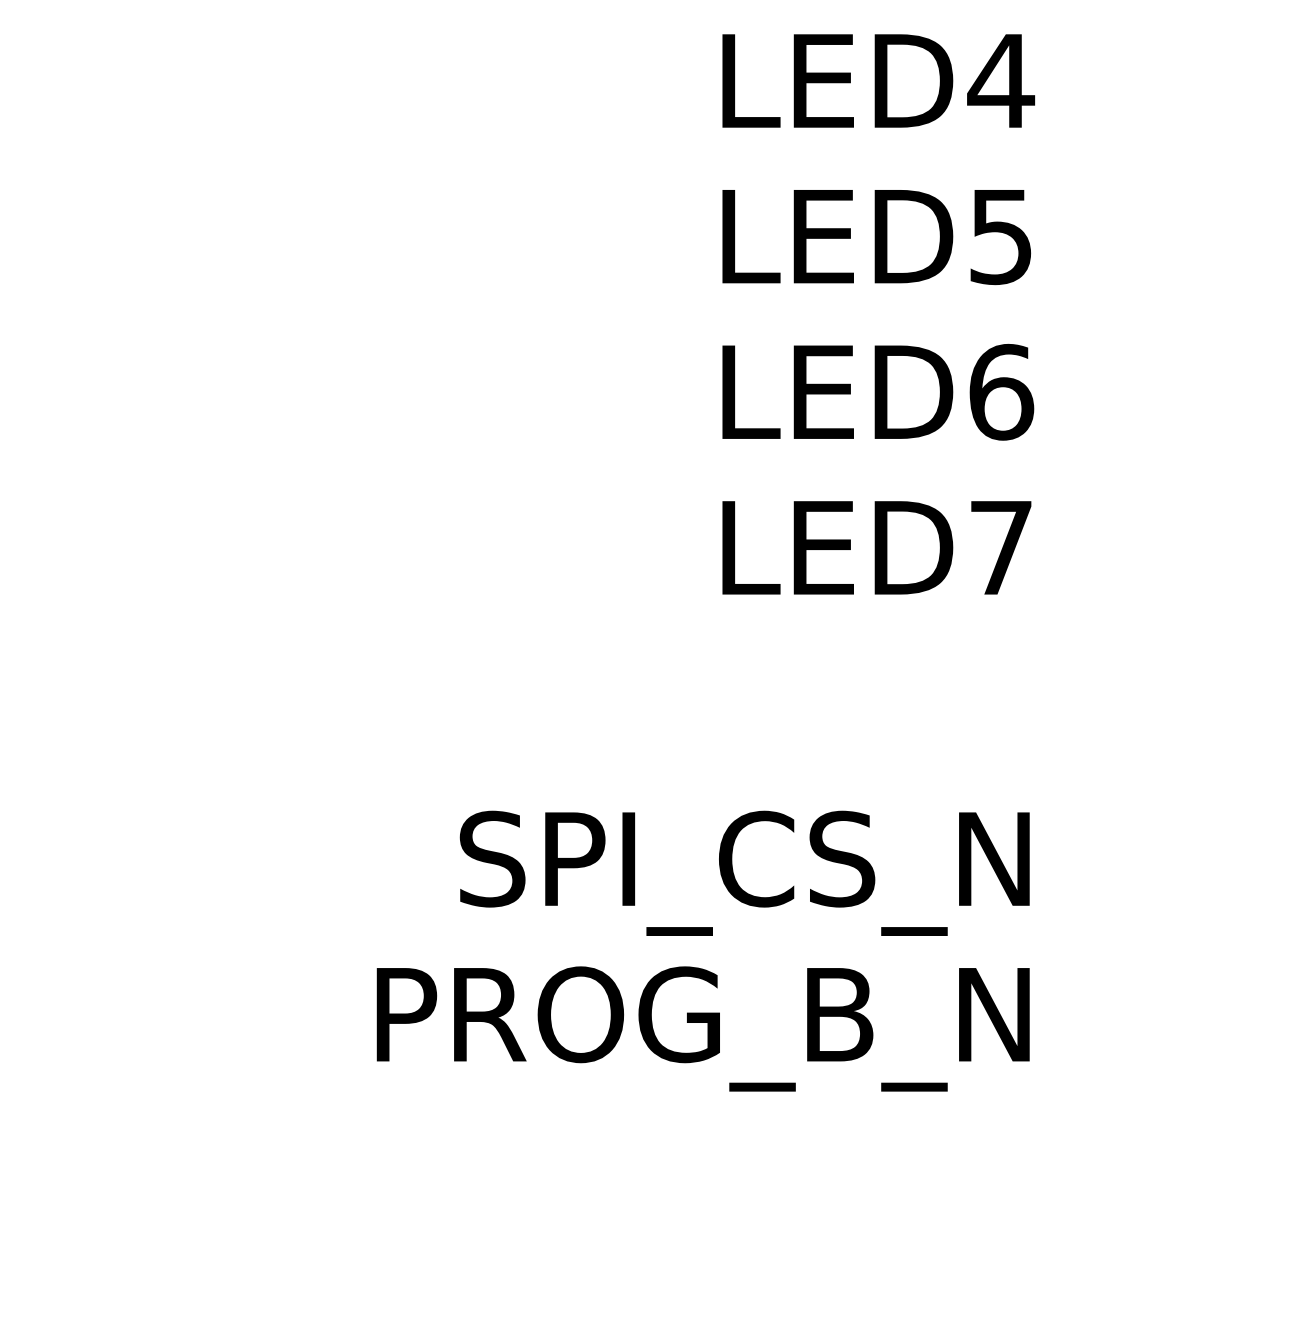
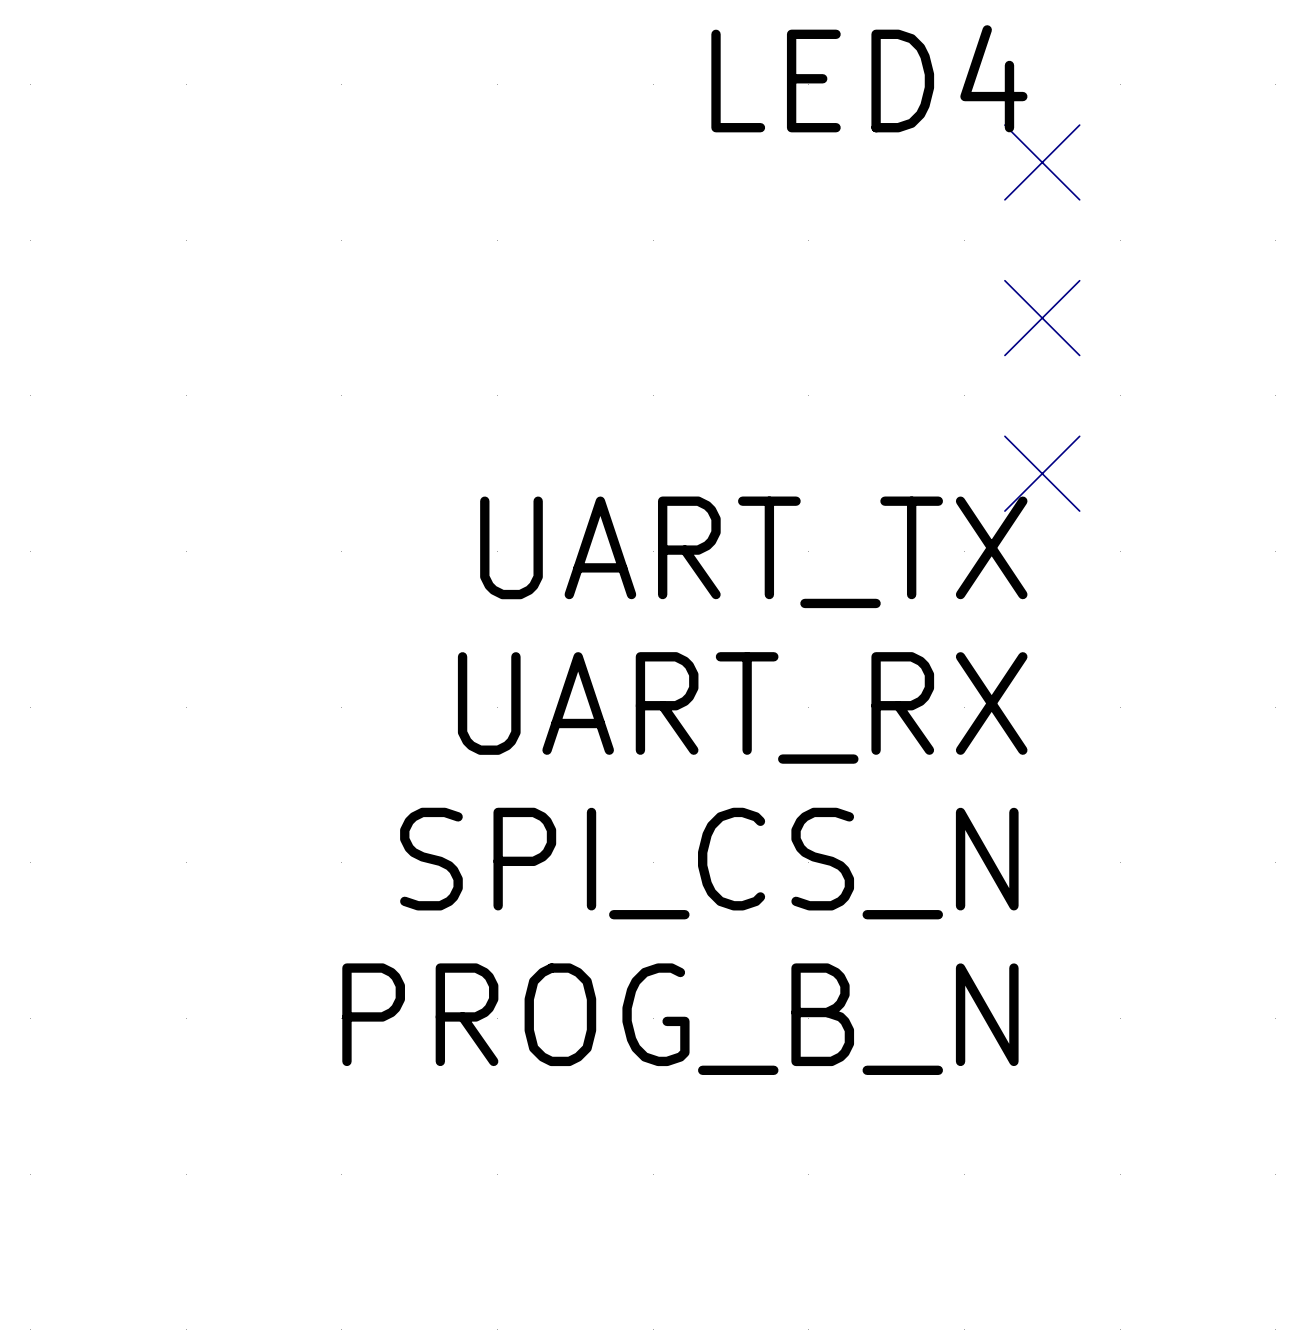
no-connect mark: none -> (1042, 162)
label: LED5 (876, 237) -> none
no-connect mark: none -> (1042, 318)
label: LED6 (878, 392) -> none
no-connect mark: none -> (1042, 473)
label: LED7 (876, 547) -> UART_TX (753, 552)
label: none -> UART_RX (742, 707)

